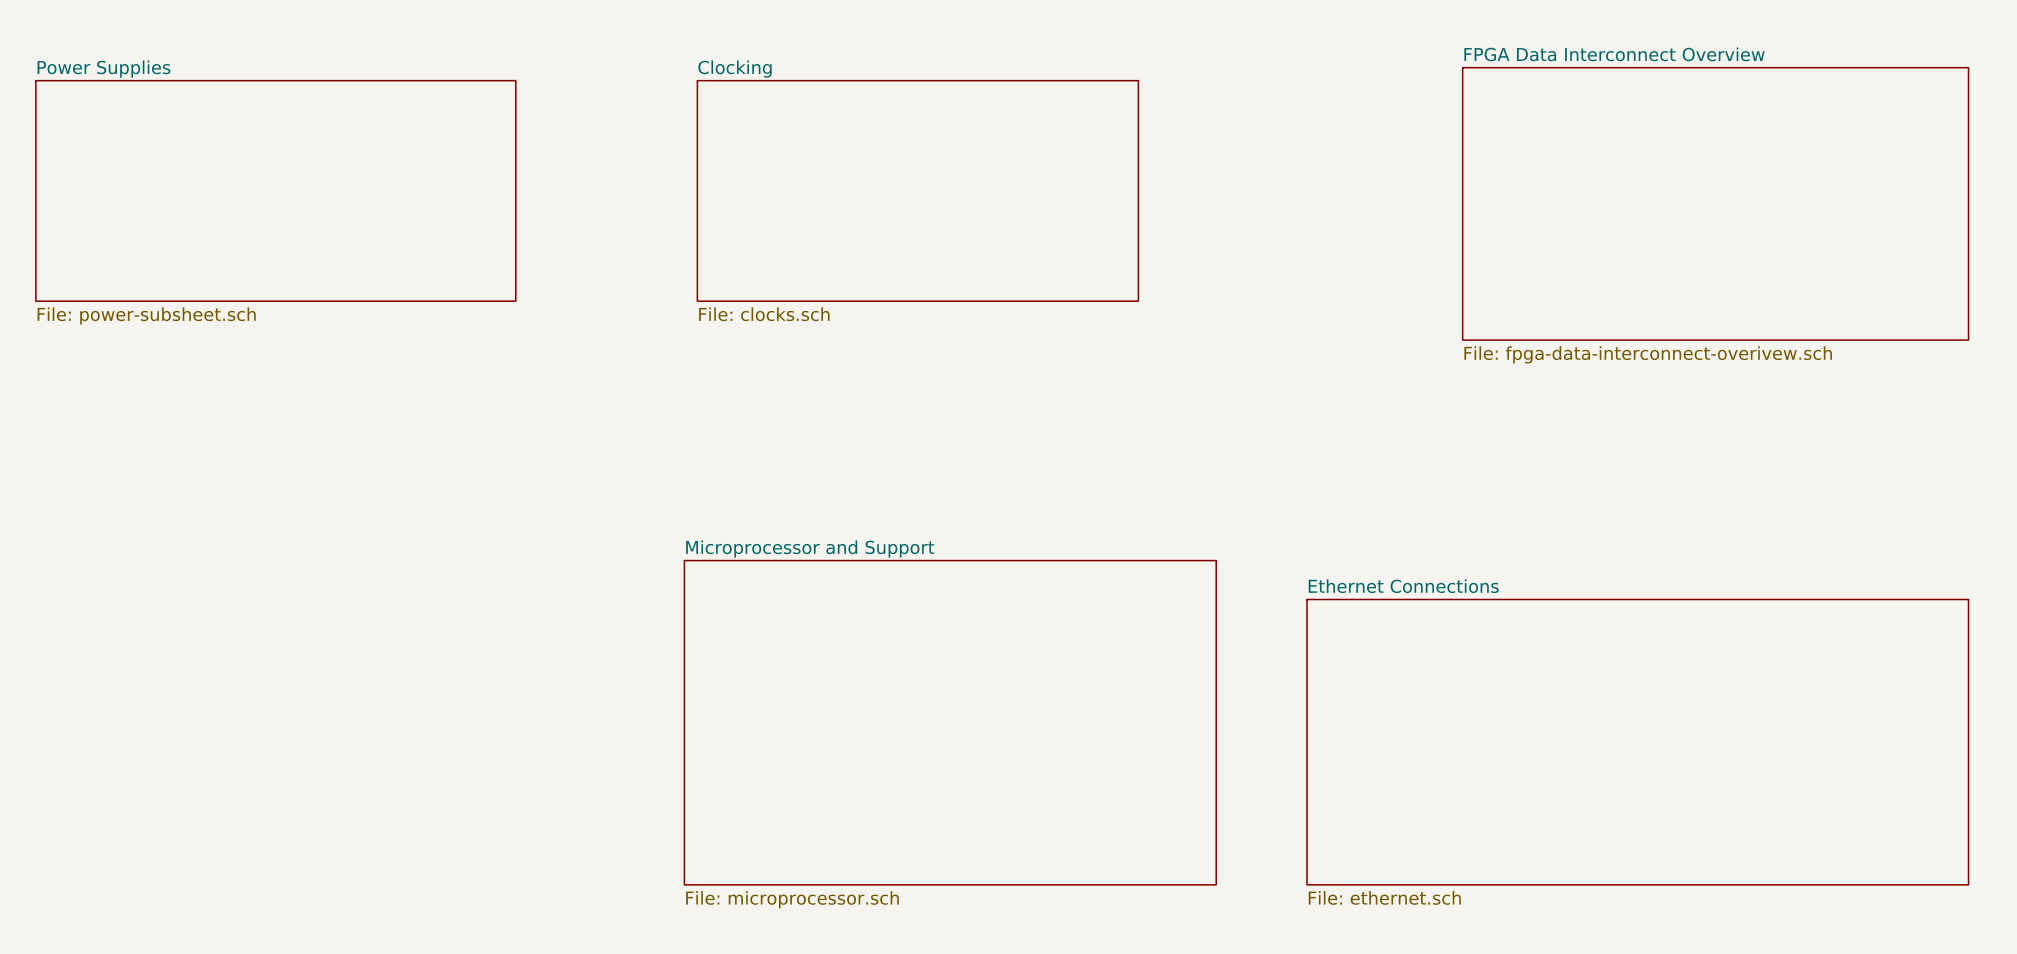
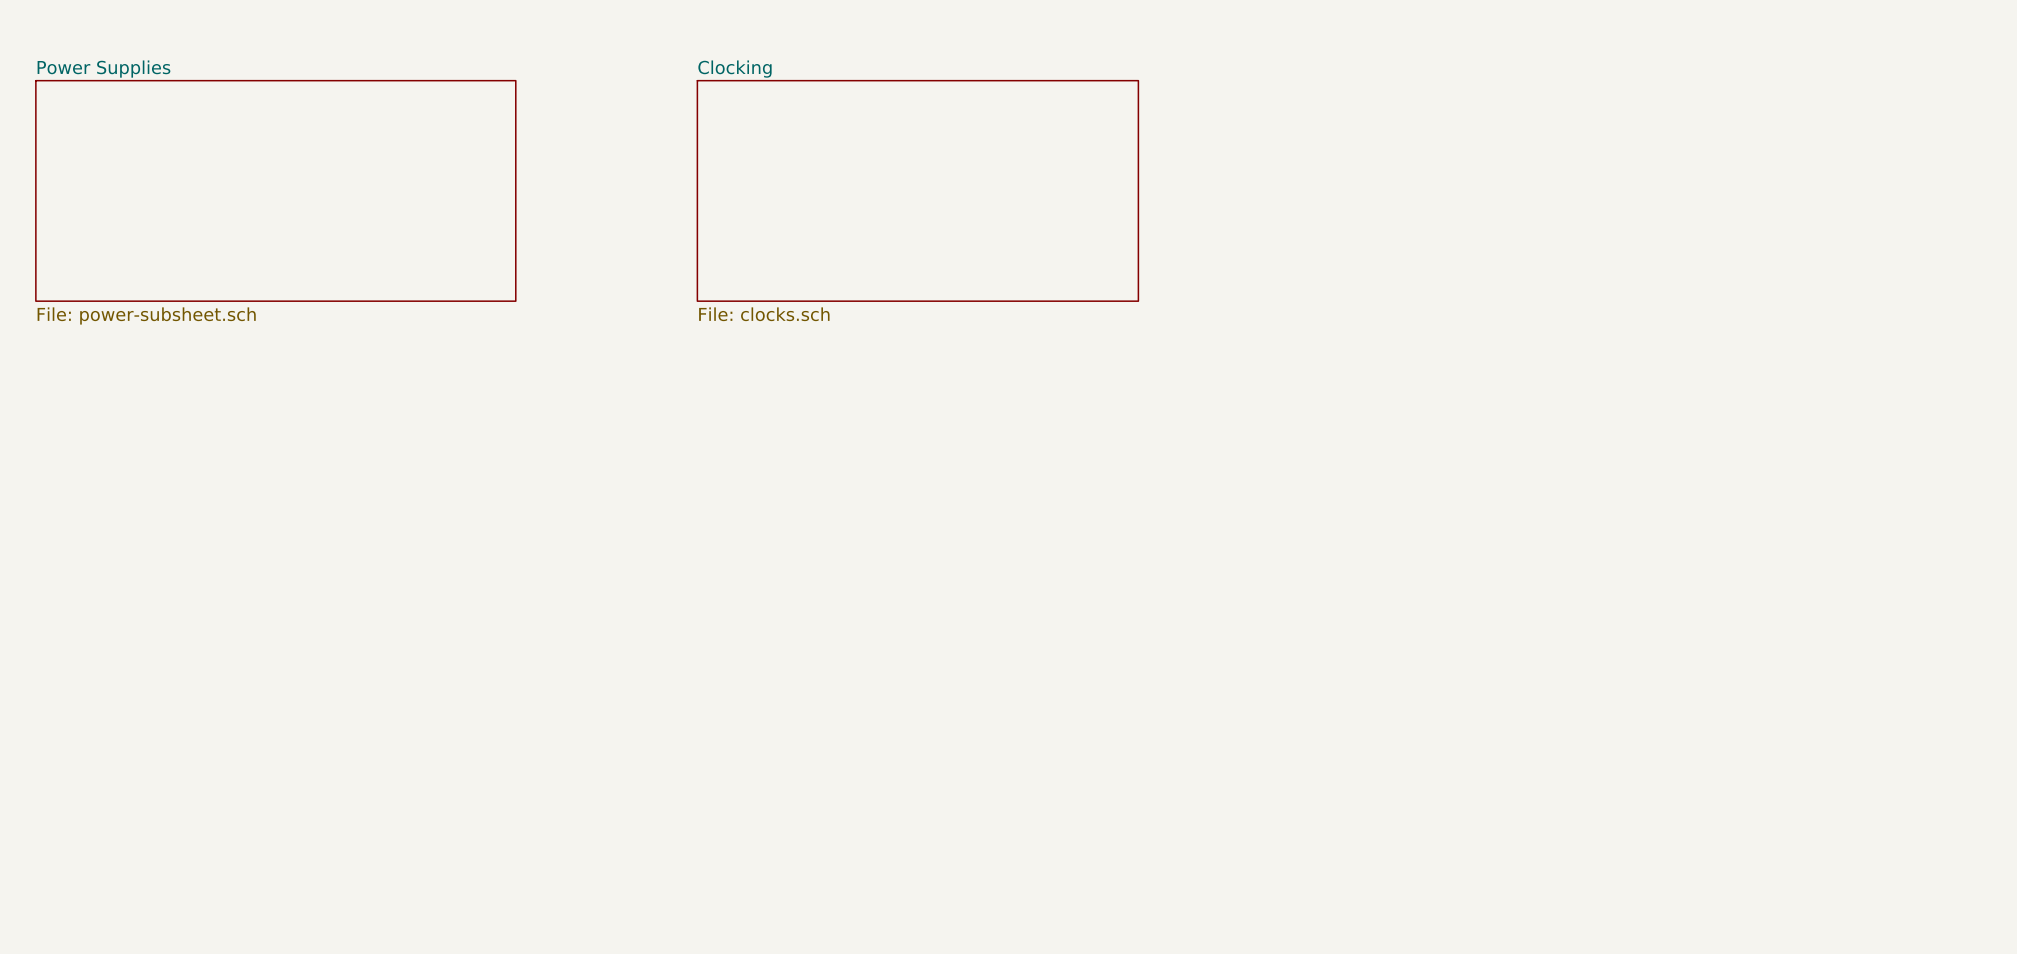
sheet FPGA Data Interconnect Overview: File: fpga-data-interconnect-overivew.sch (1715, 203) -> none
sheet Microprocessor and Support: File: microprocessor.sch (950, 722) -> none
sheet Ethernet Connections: File: ethernet.sch (1637, 742) -> none

